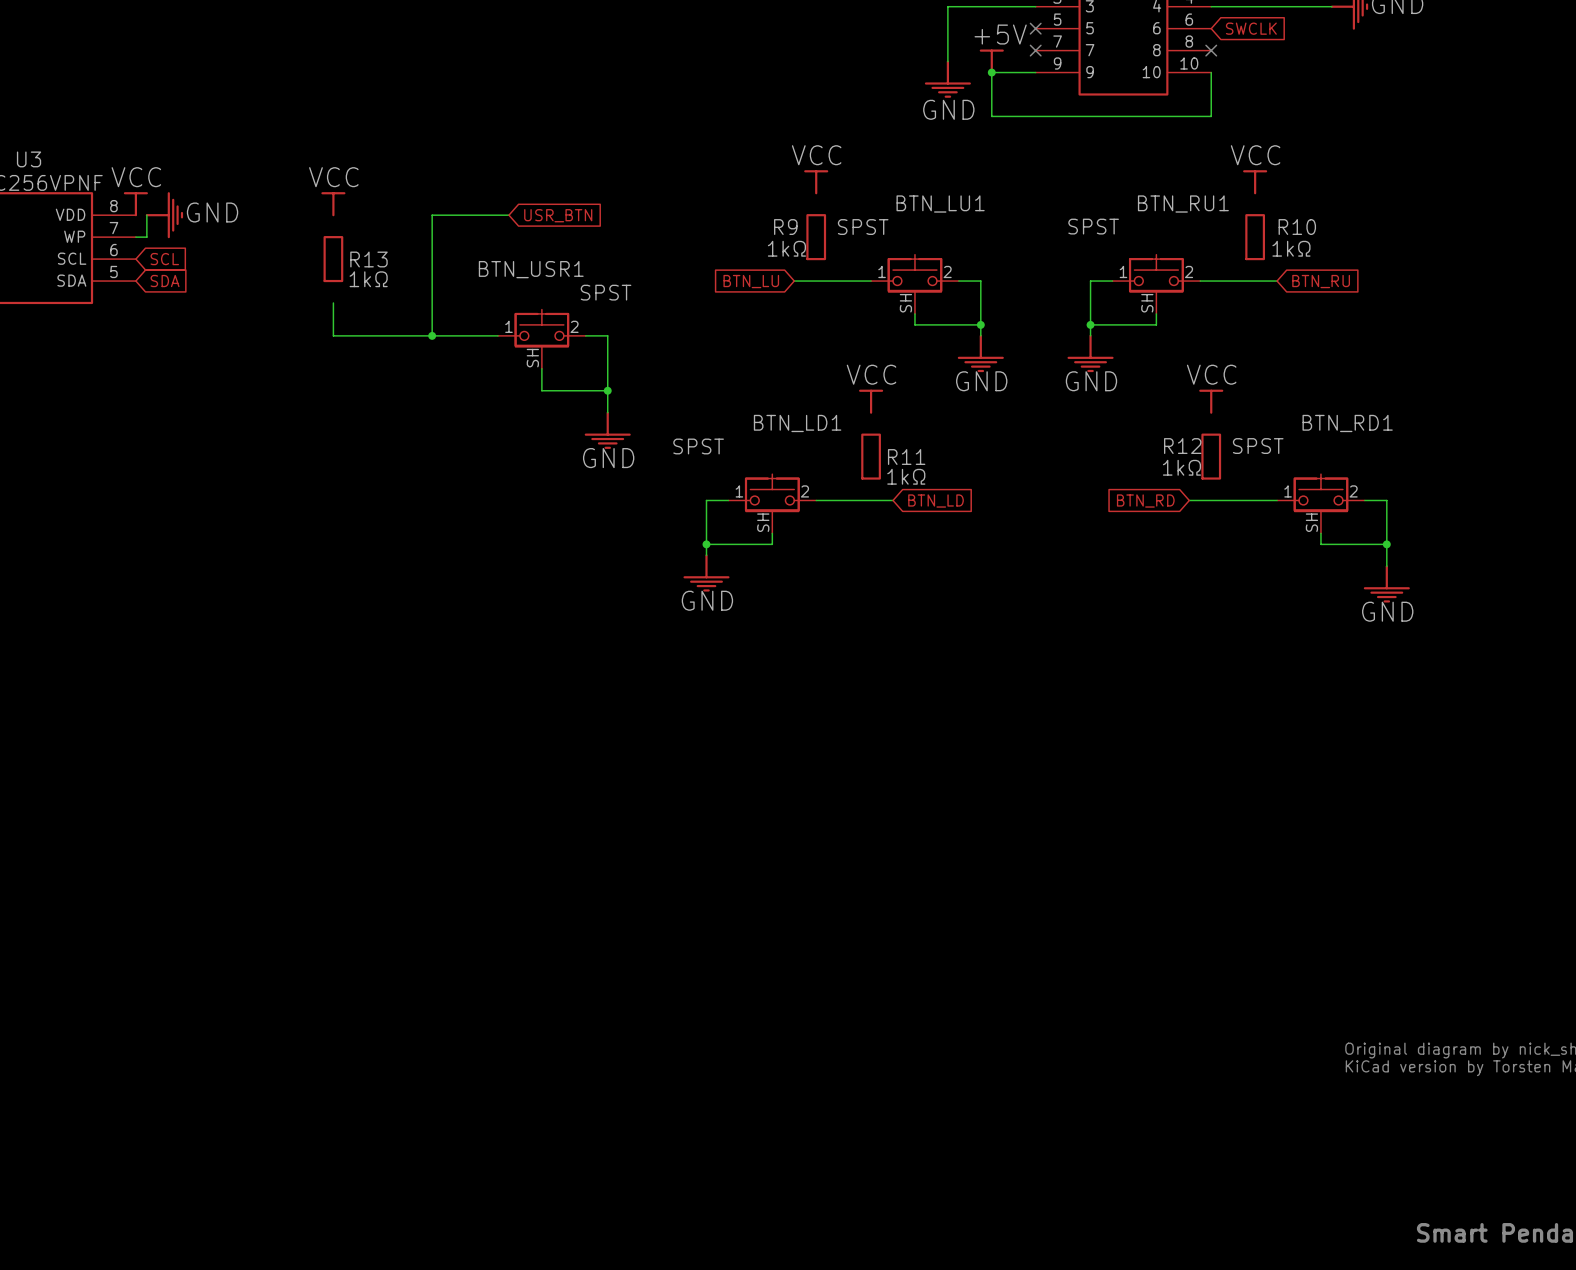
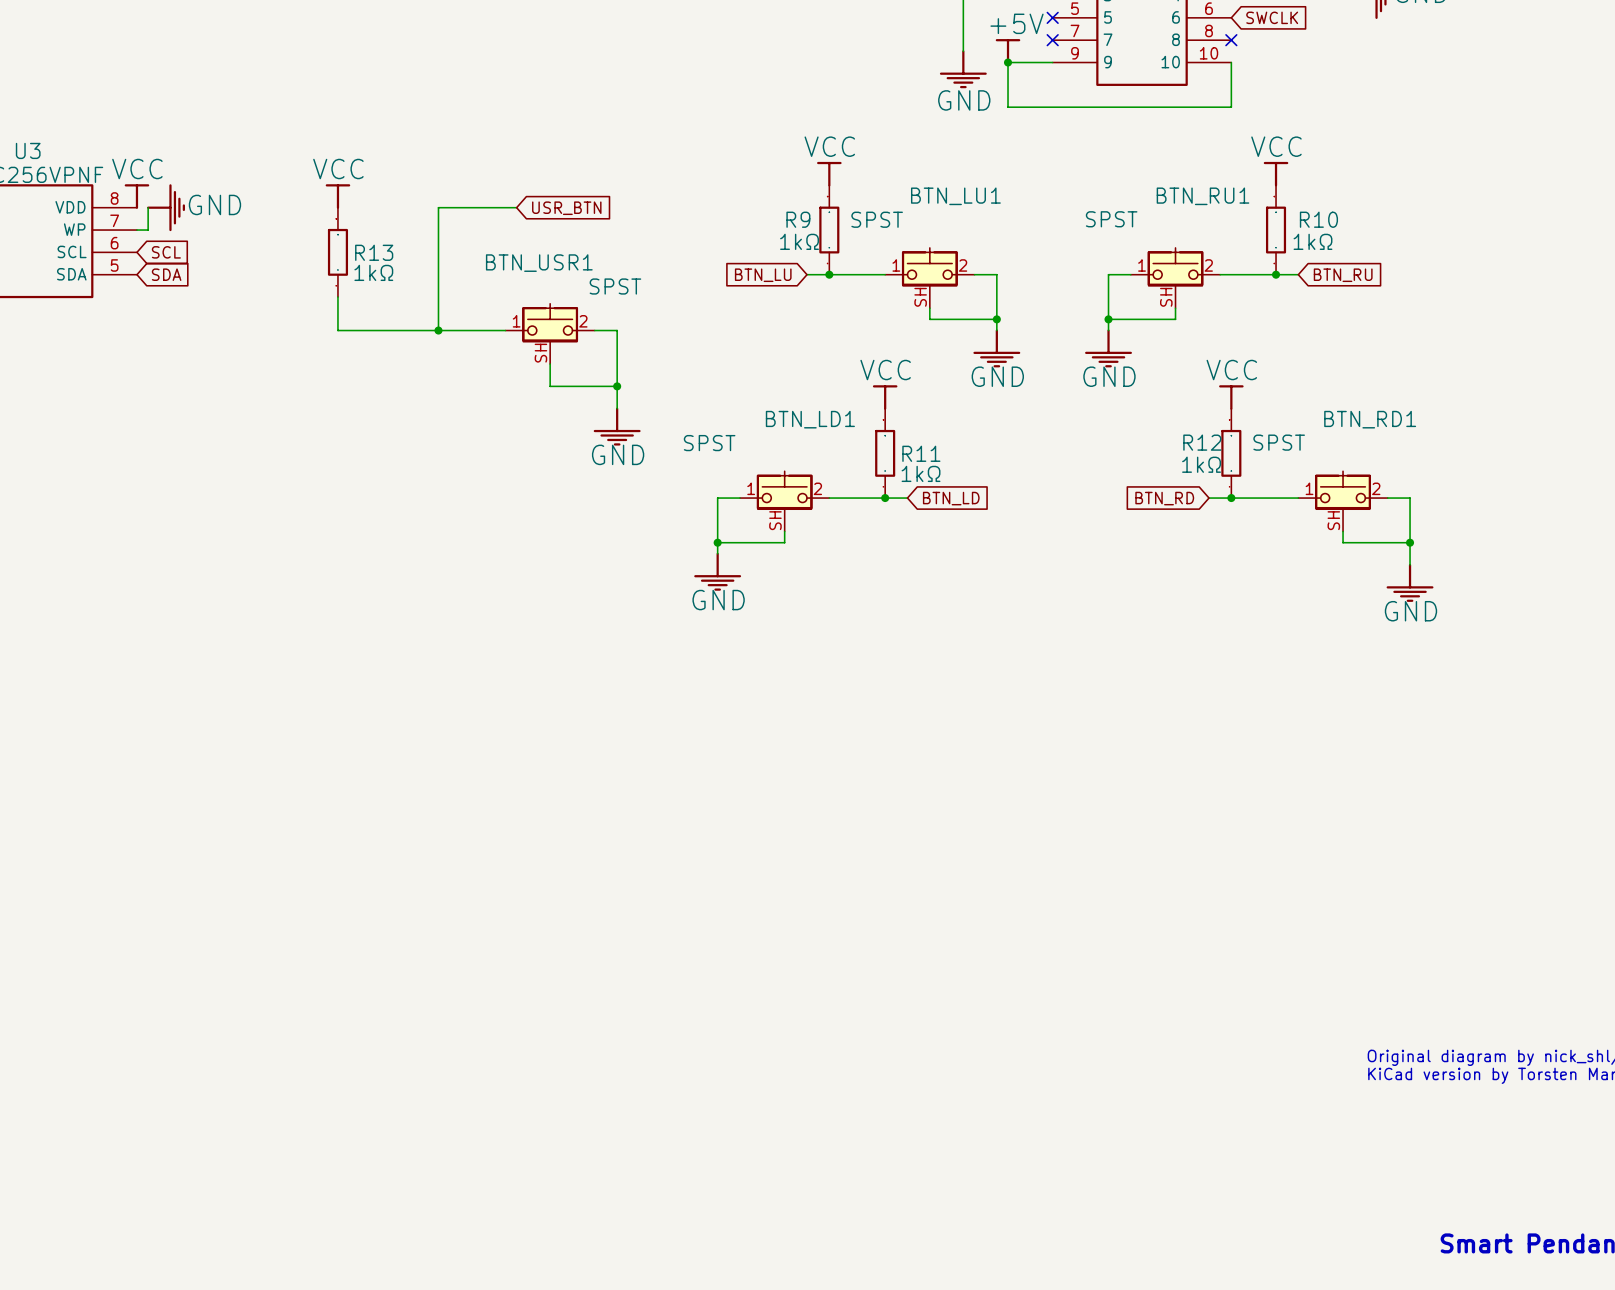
R9 symbol: [806, 214, 827, 261] -> [819, 185, 840, 275]
R10 symbol: [1245, 214, 1266, 261] -> [1265, 185, 1287, 275]
R13 symbol: [323, 236, 344, 283] -> [327, 207, 349, 298]
junction: none -> (829, 274)
junction: none -> (1276, 274)
R11 symbol: [861, 433, 881, 480] -> [875, 408, 896, 499]
R12 symbol: [1201, 433, 1222, 480] -> [1221, 408, 1242, 499]
junction: none -> (885, 498)
junction: none -> (1231, 498)

